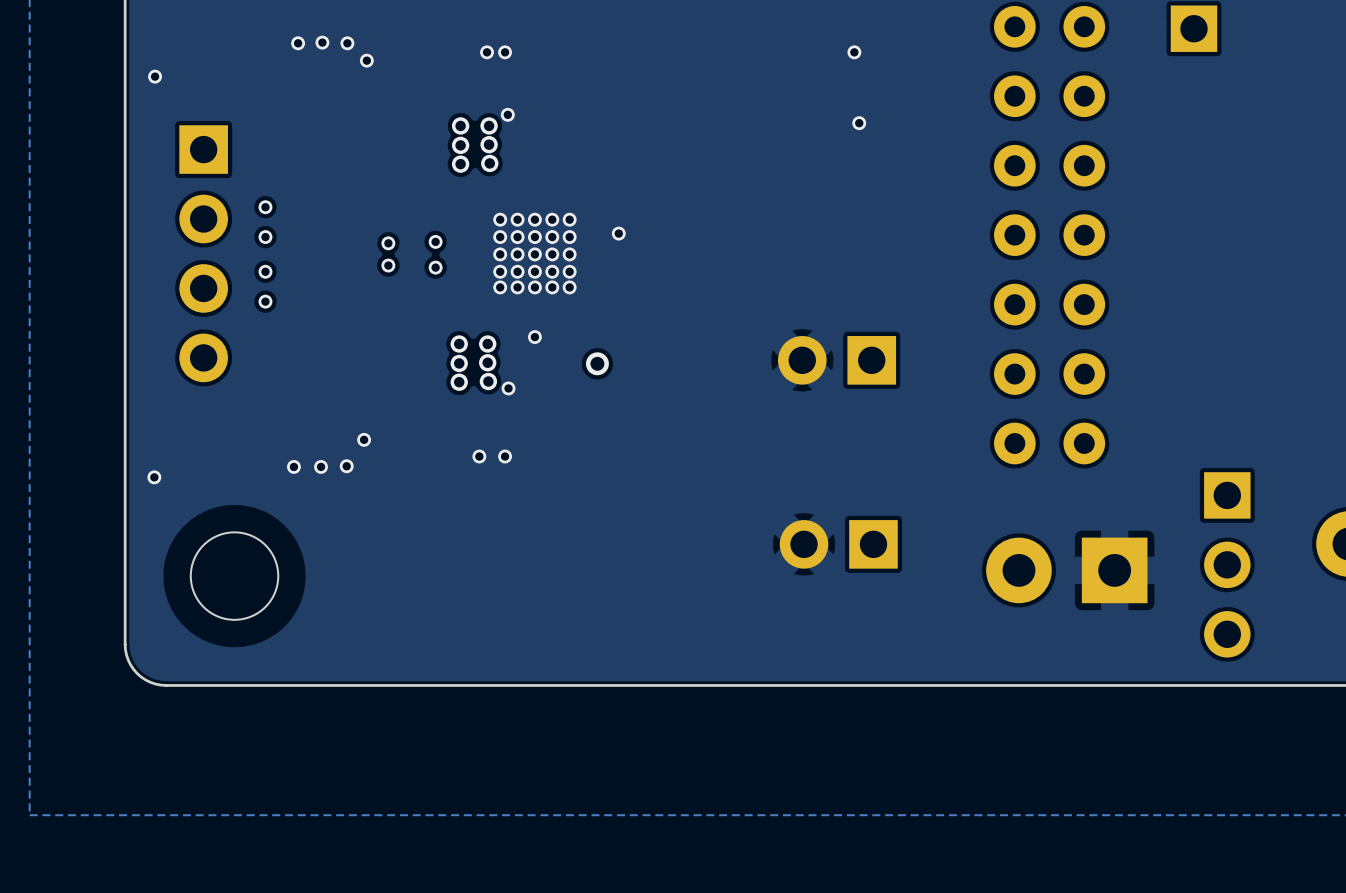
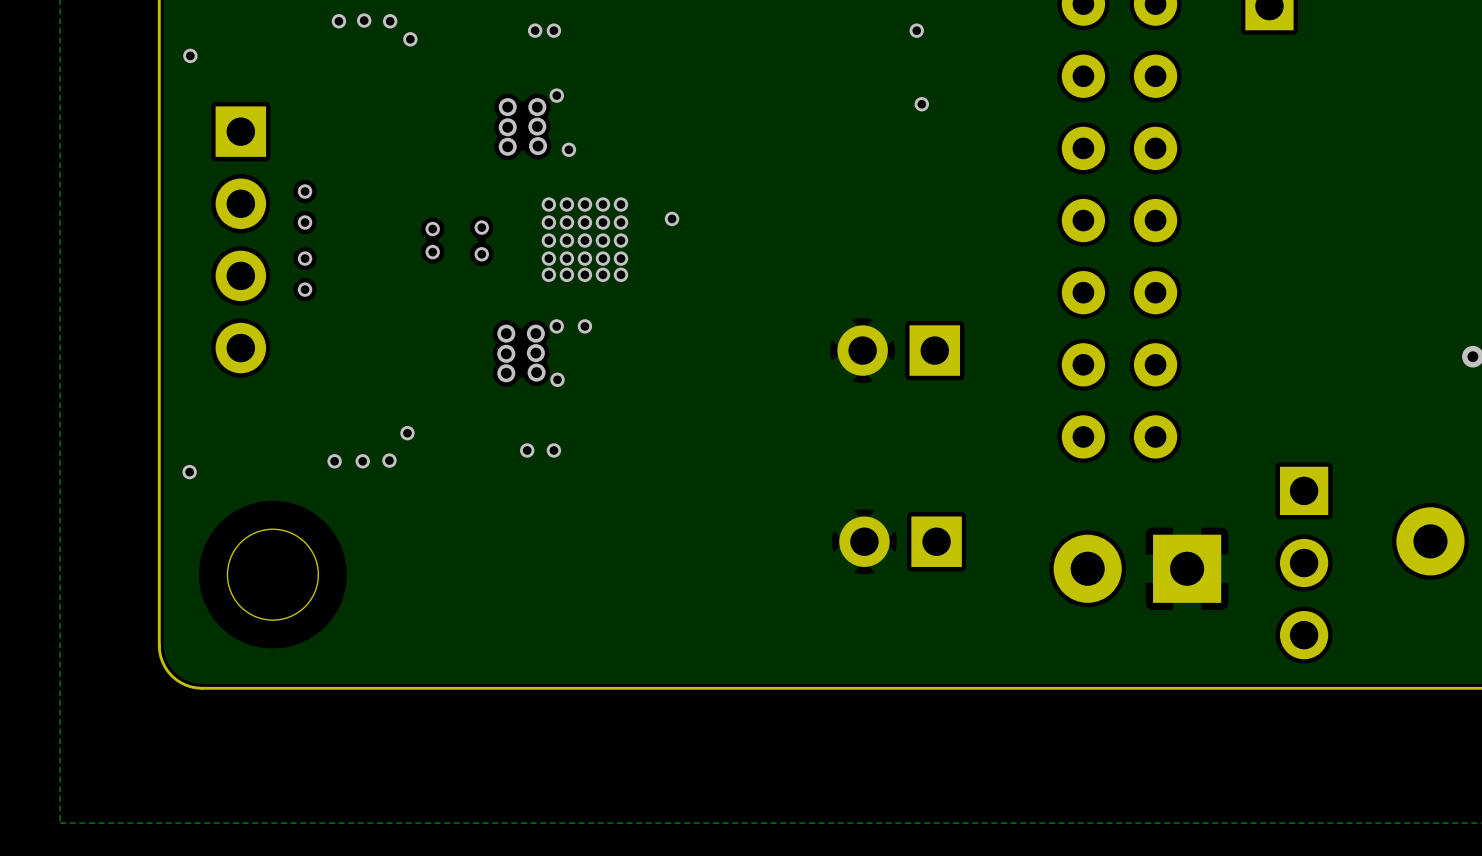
via: none -> (568, 149)
via: none -> (556, 326)
via: (597, 363) -> none

